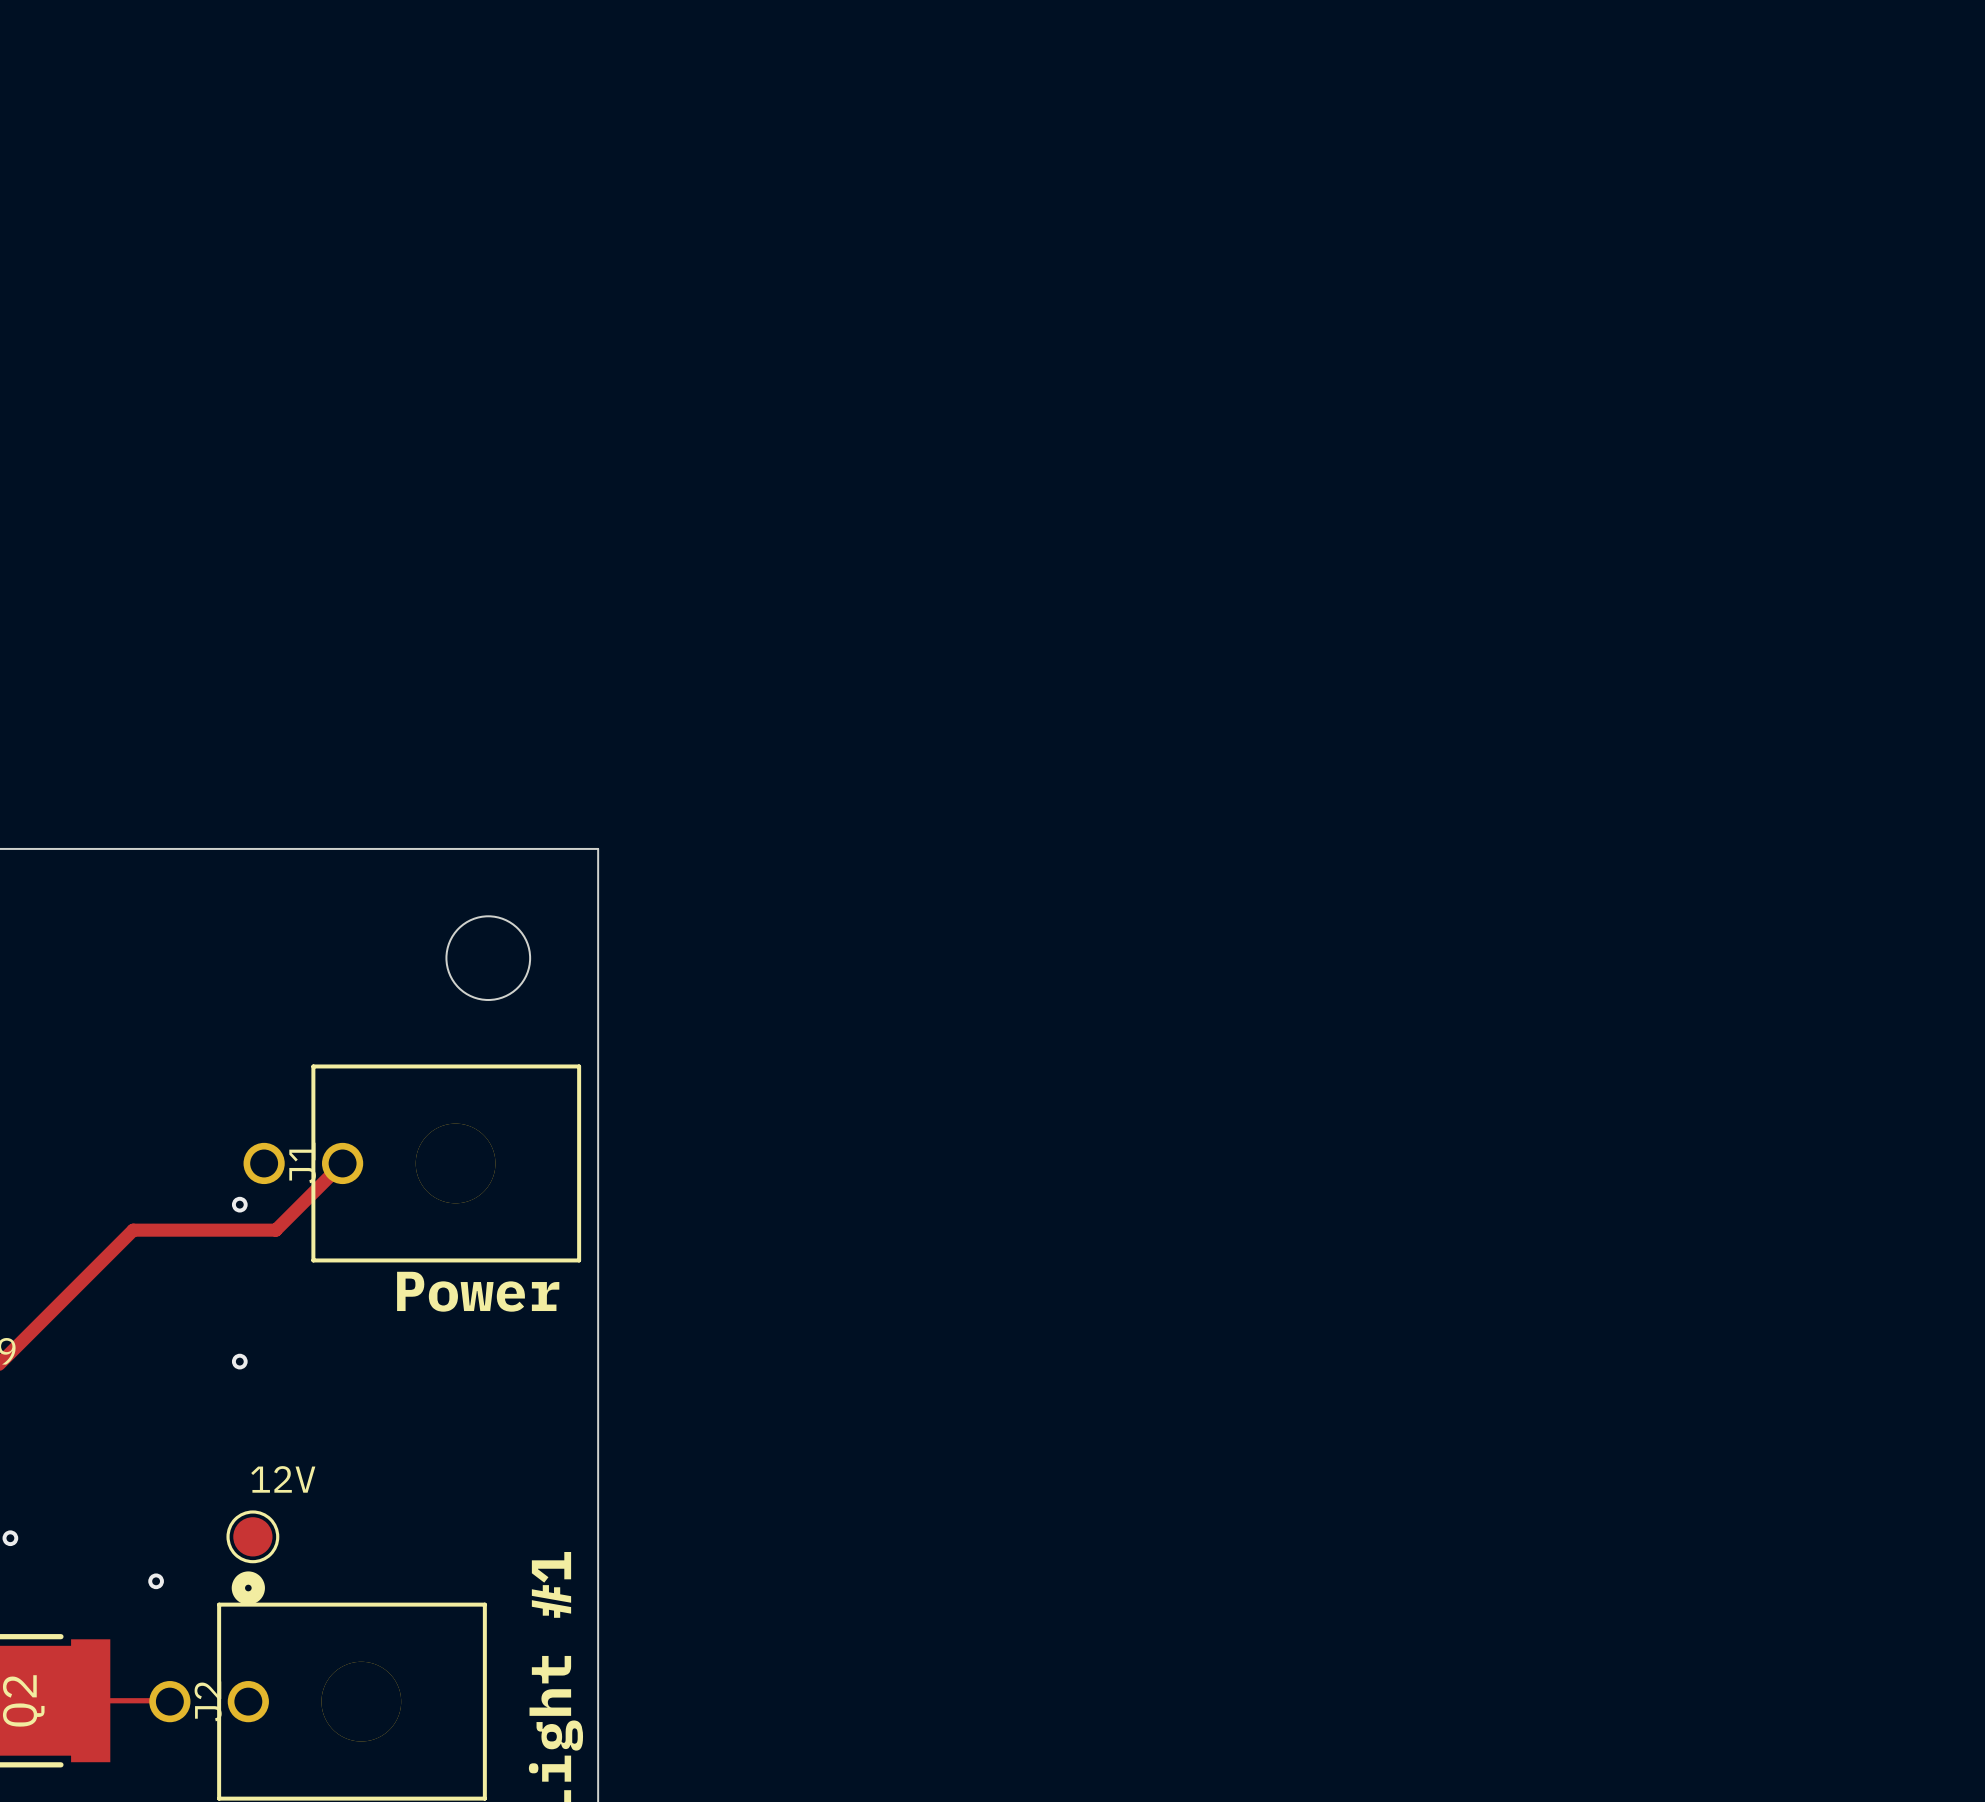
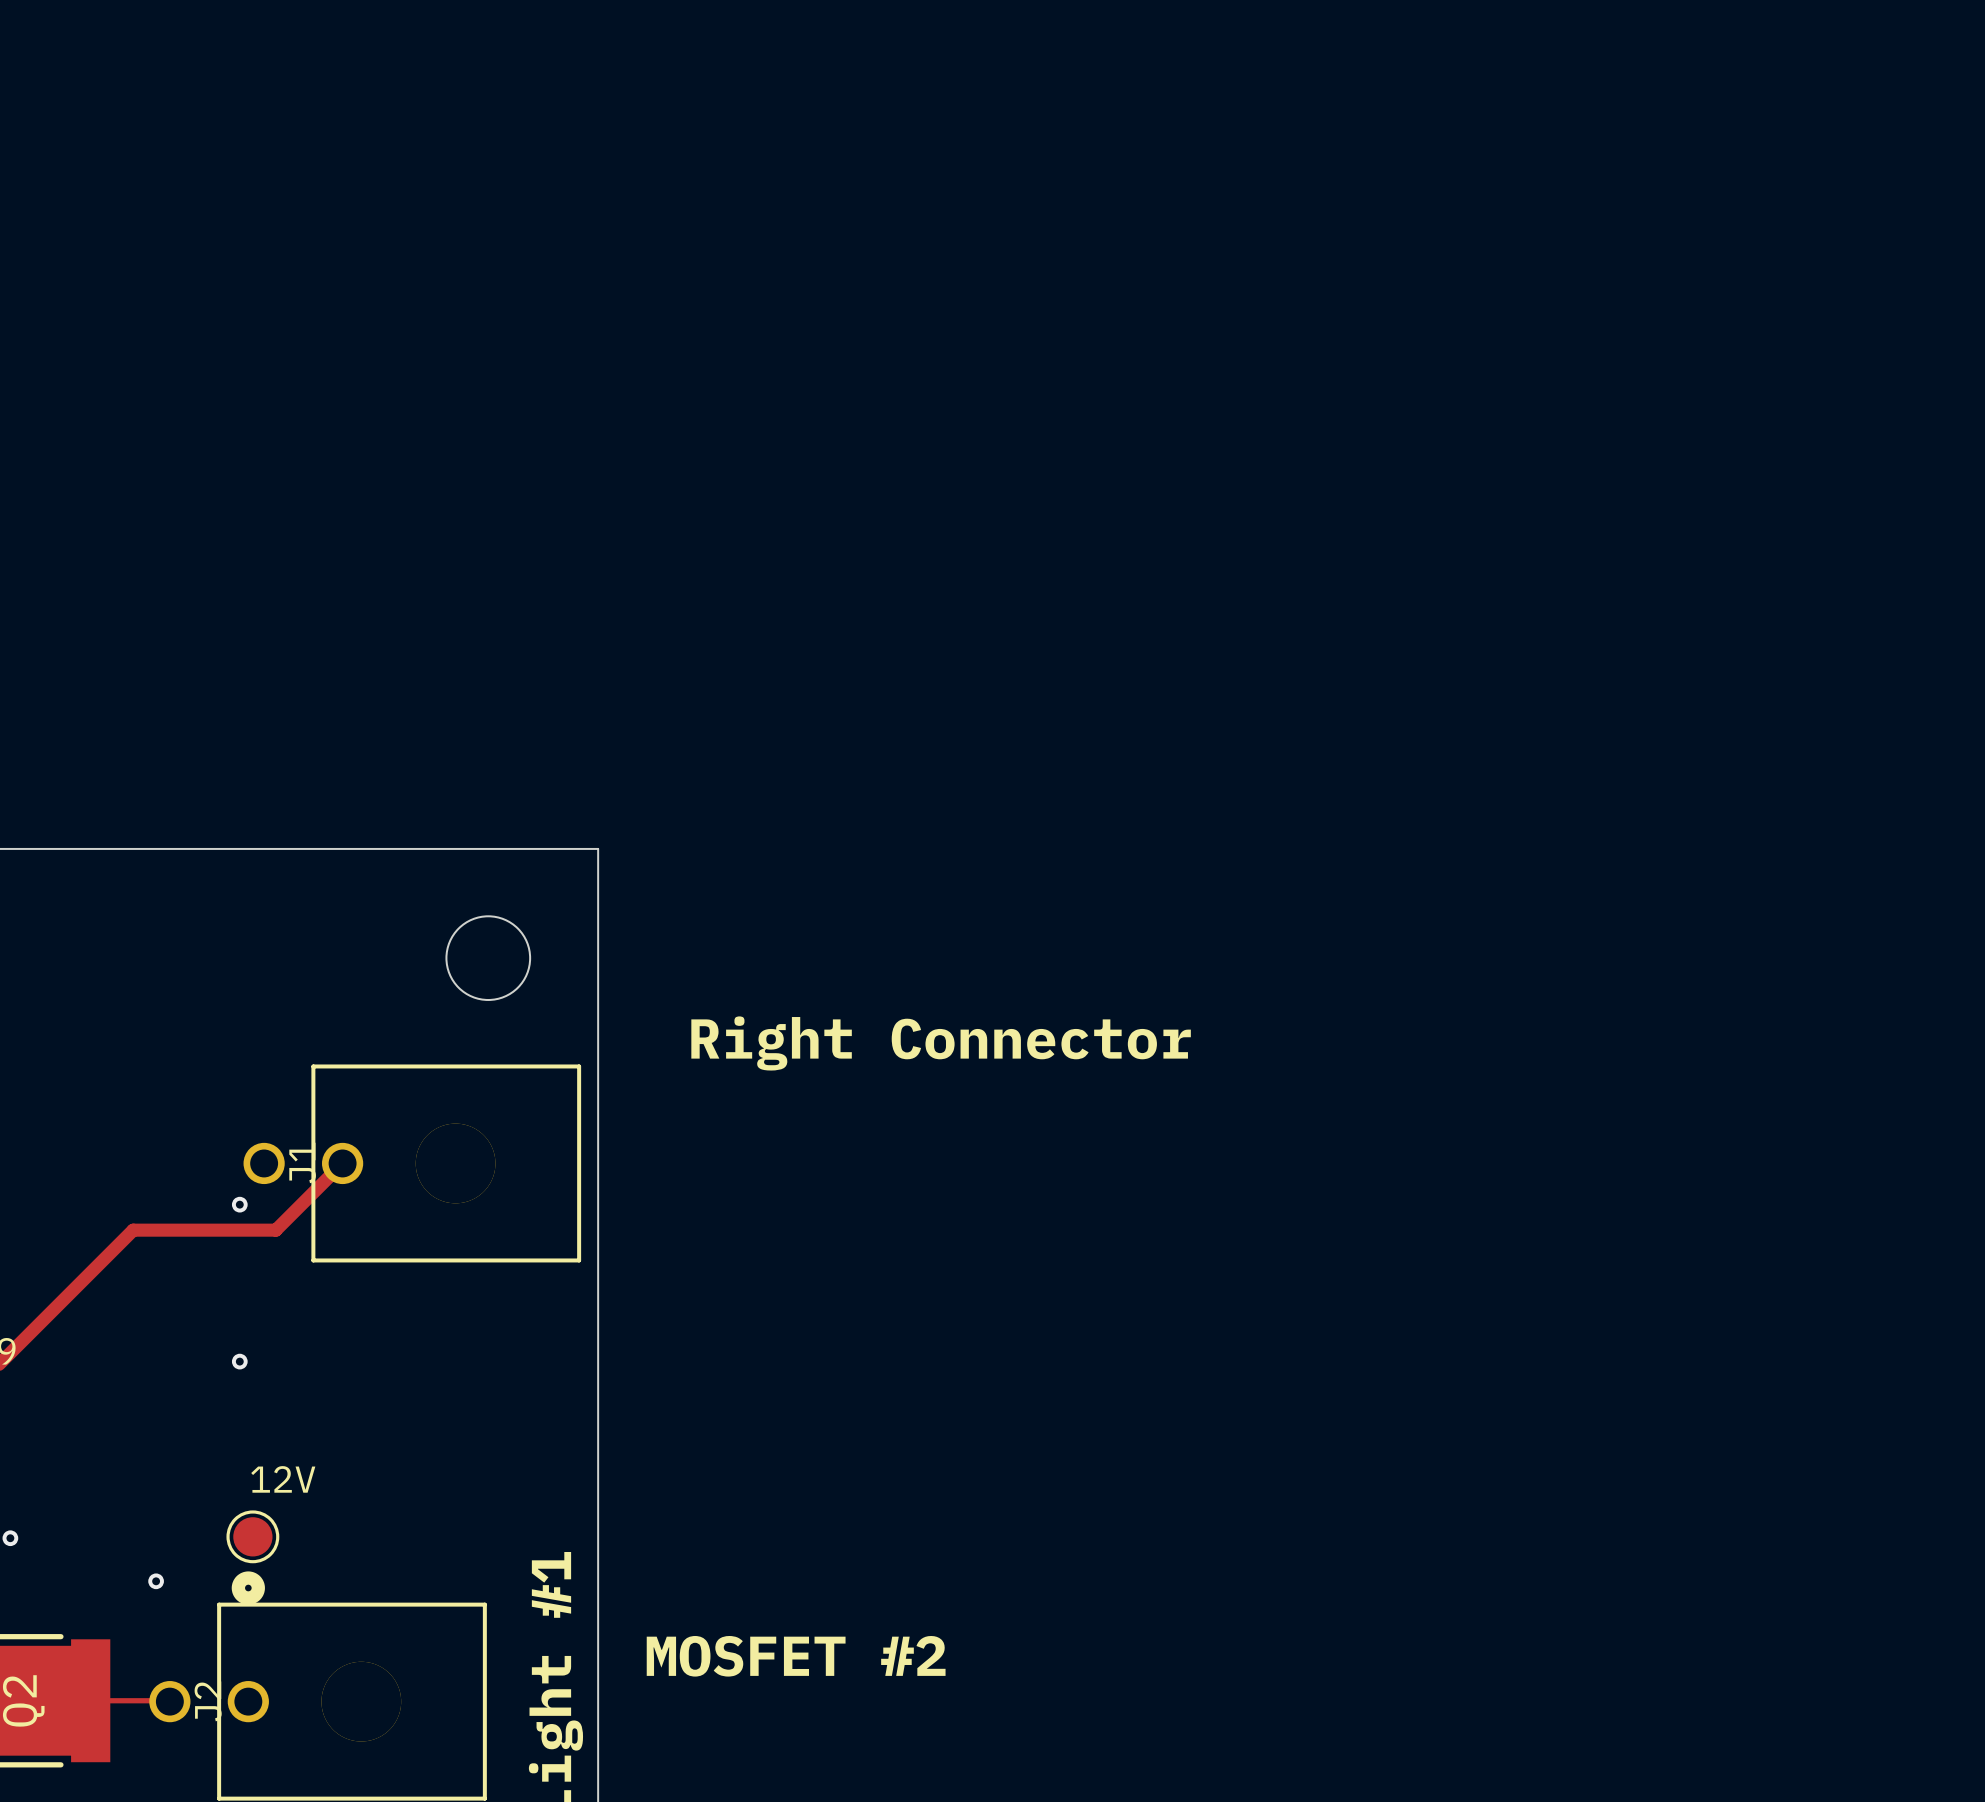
text: none -> Right Connector (941, 1043)
text: Power (478, 1291) -> none
text: none -> MOSFET #2 (796, 1656)

